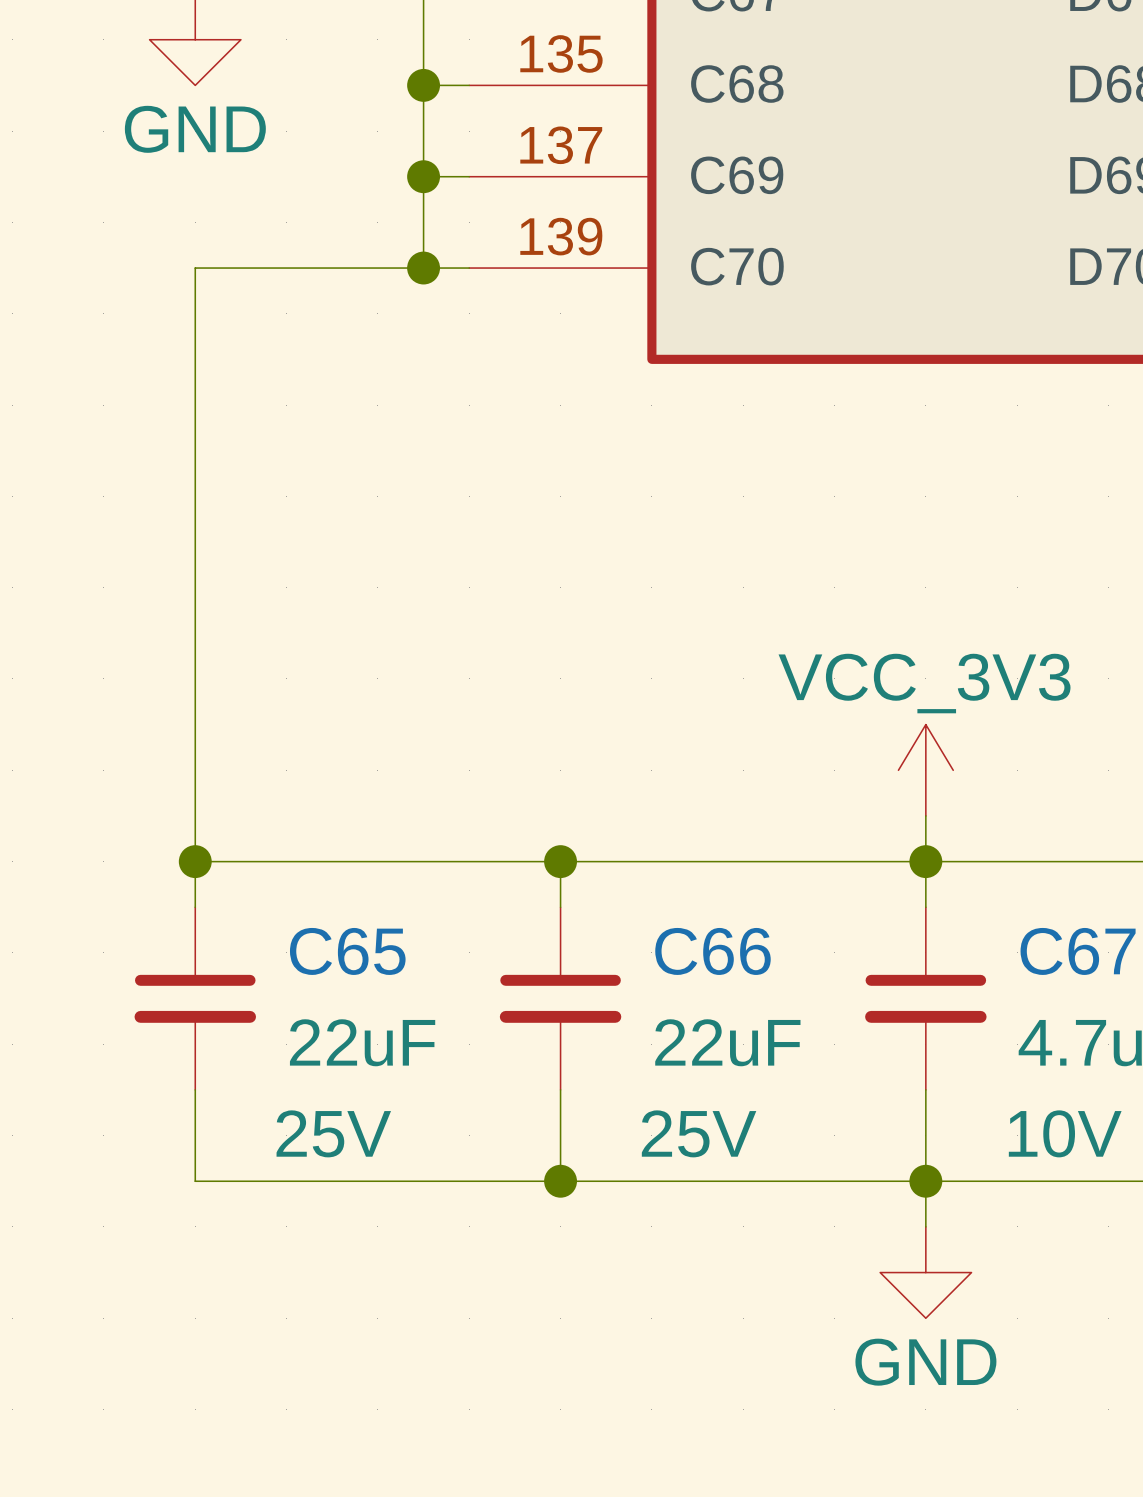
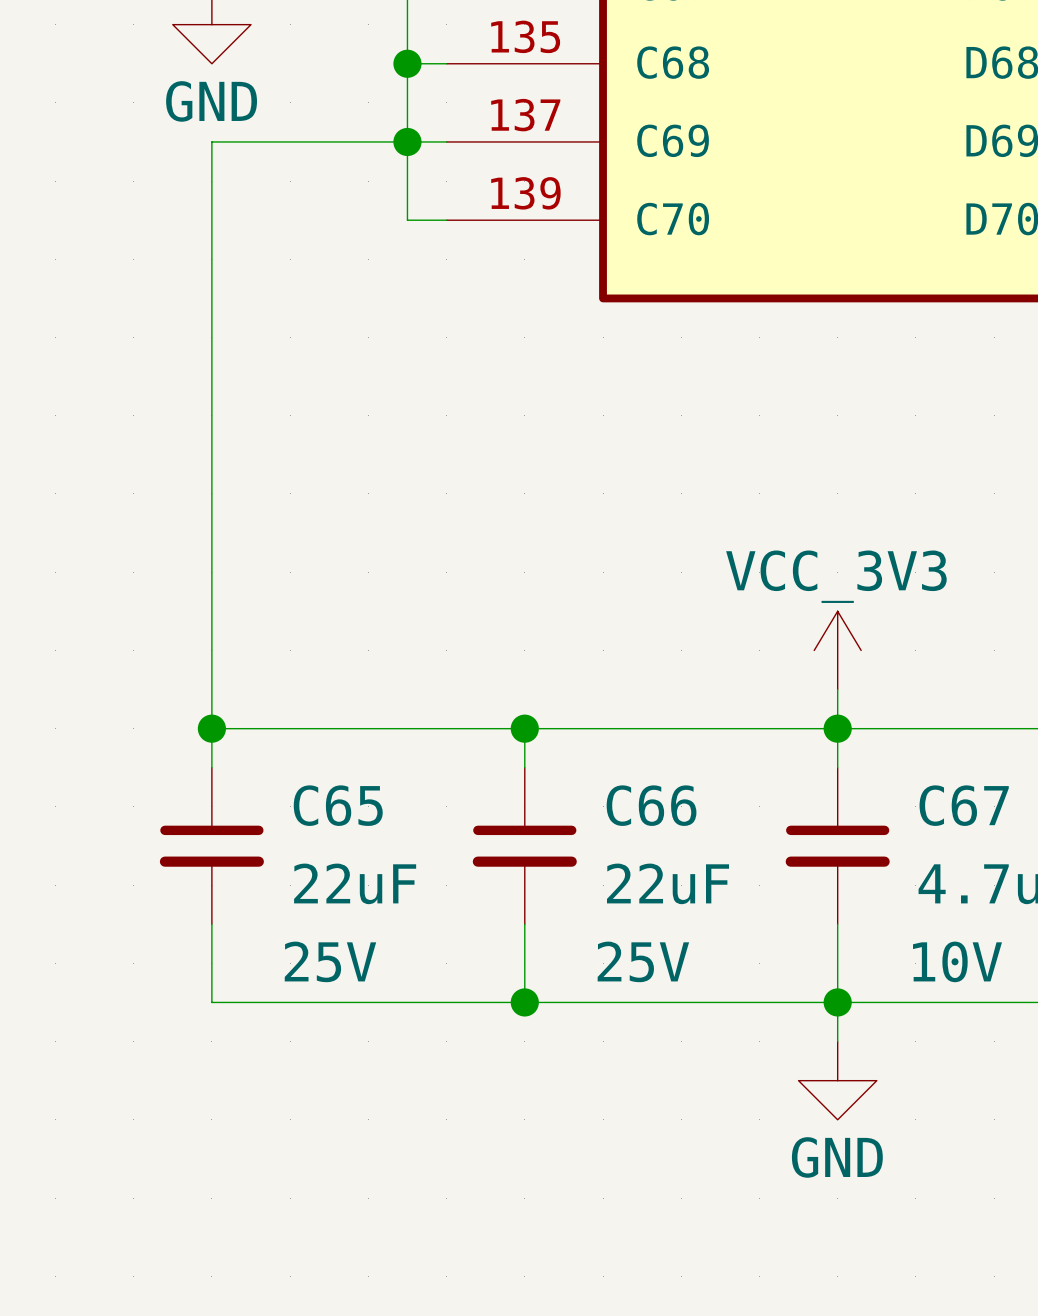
wire: (195, 268) (423, 268) -> (211, 220) (211, 141) (407, 141)
junction: (423, 268) -> none

